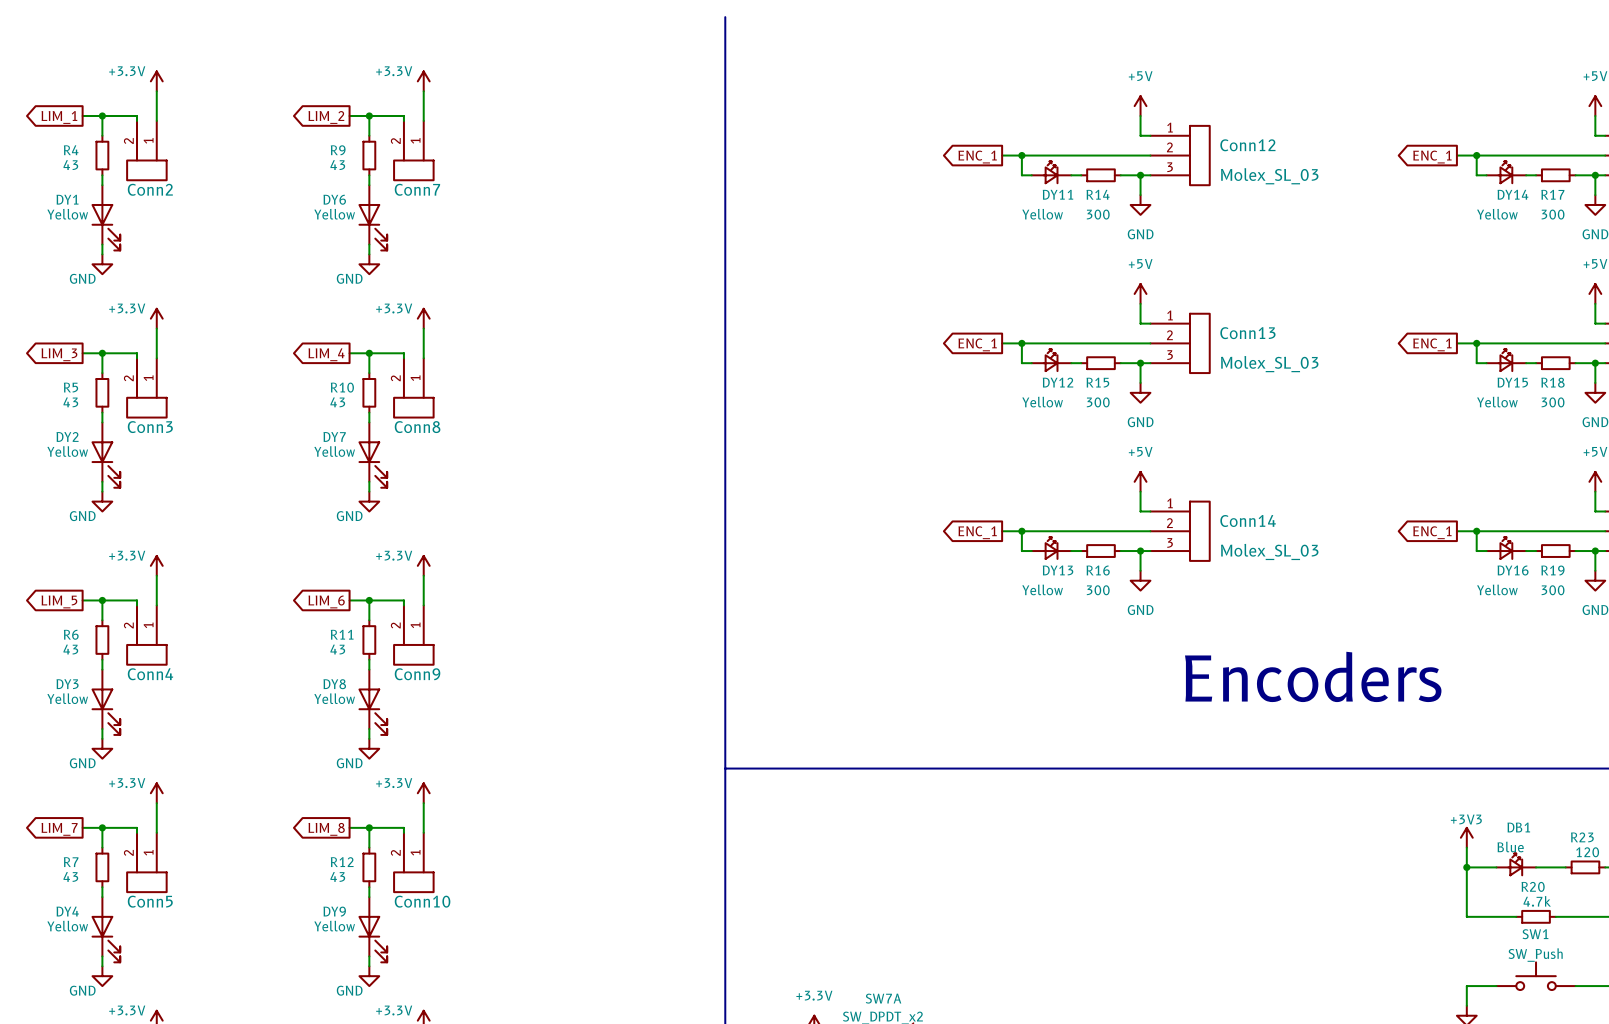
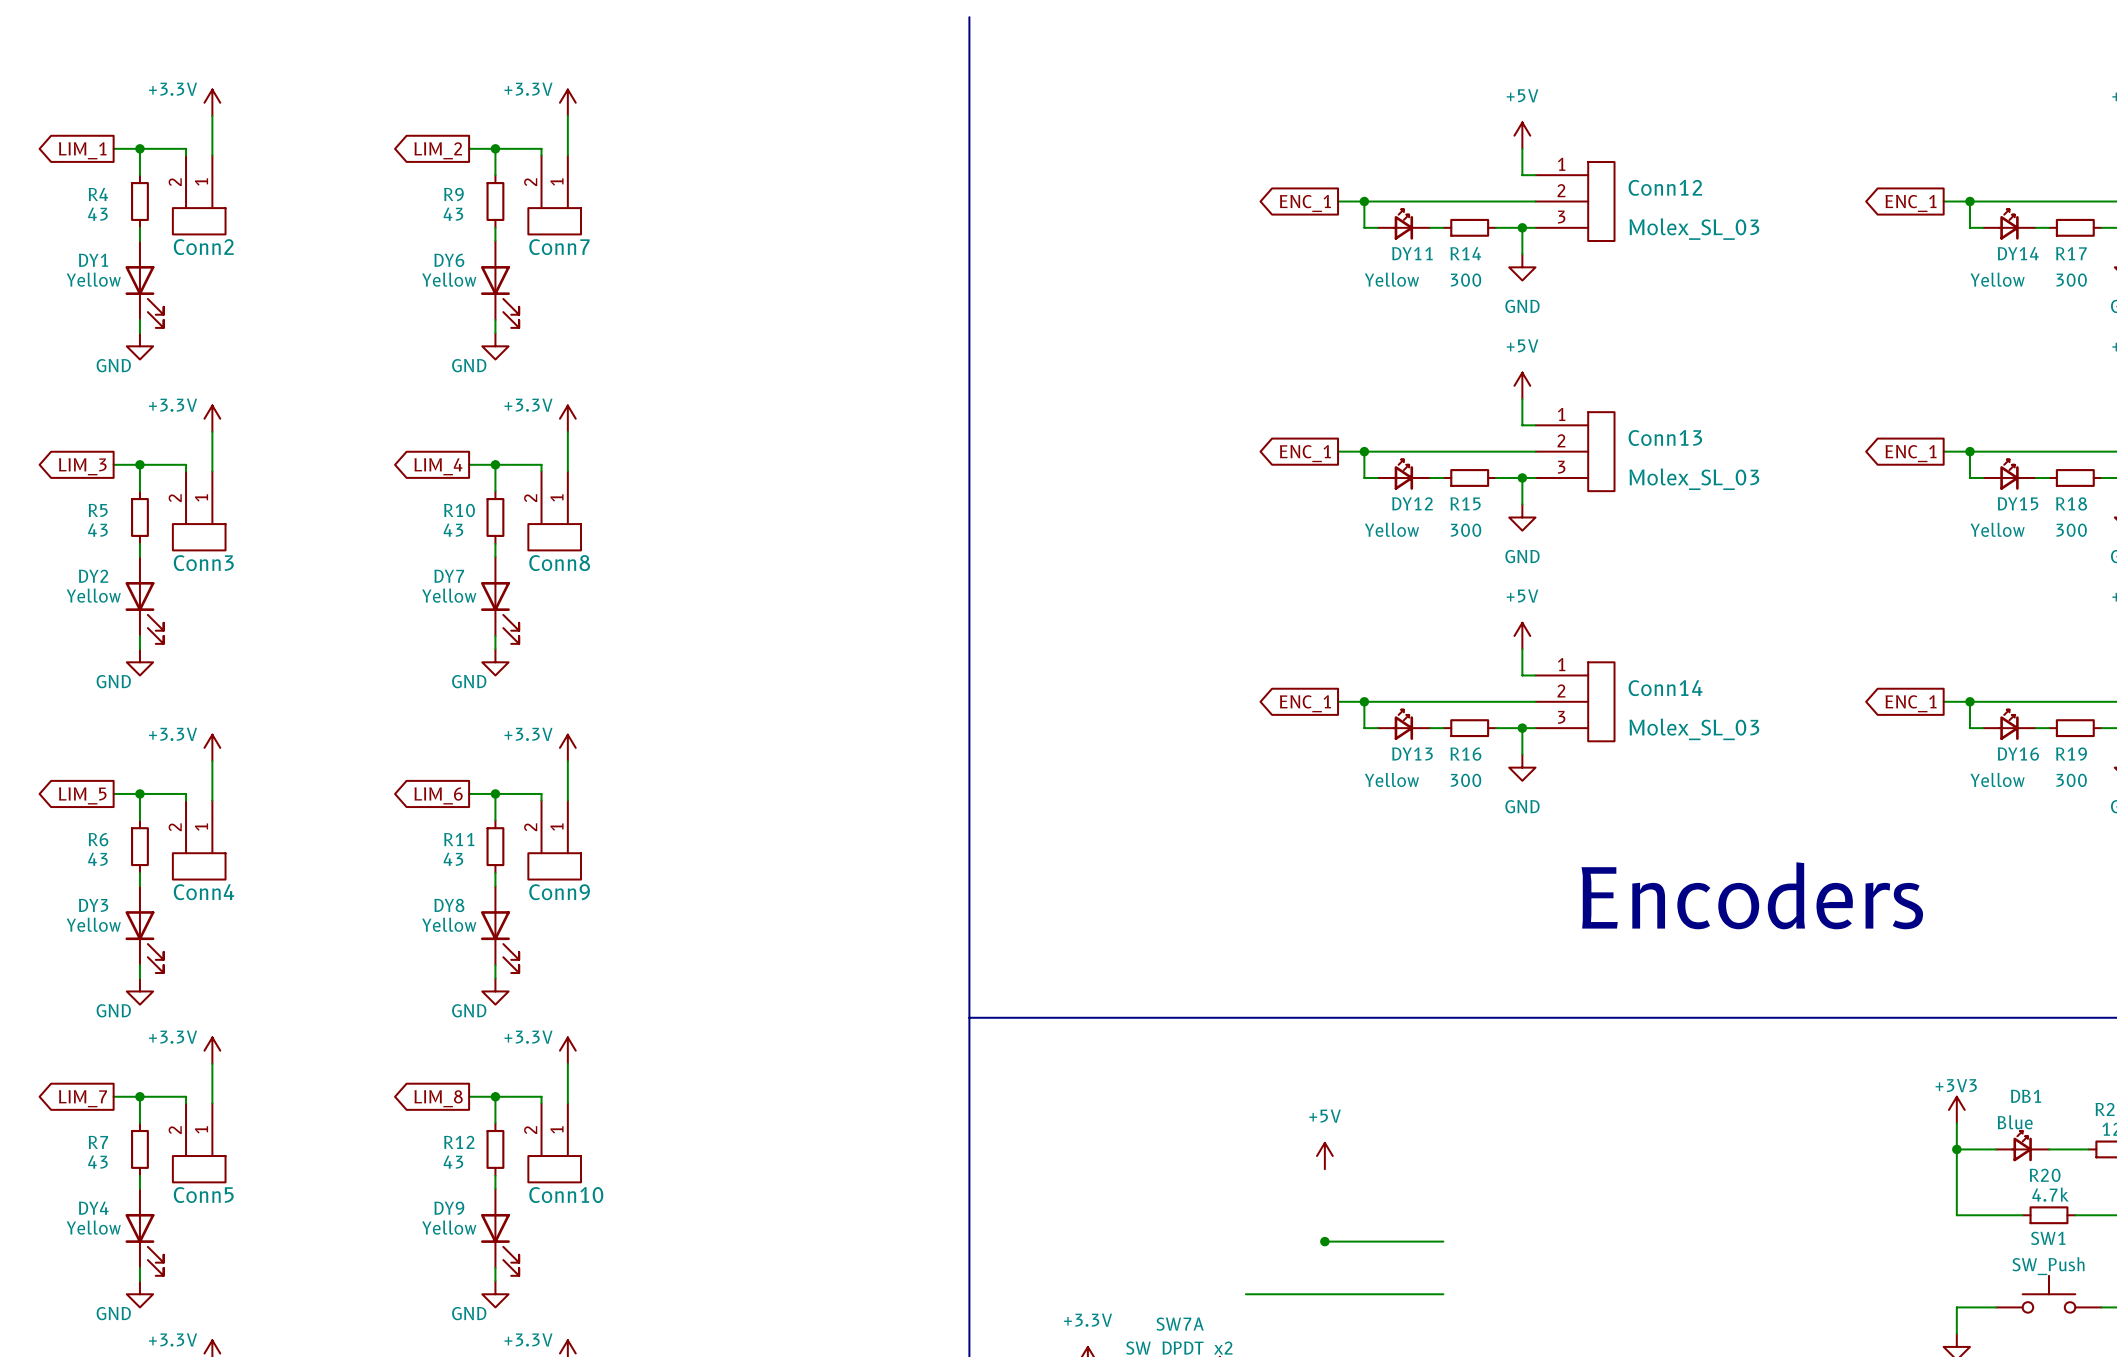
power symbol: none -> +5V (1324, 1156)
wire: none -> (1324, 1241) (1443, 1241)
junction: none -> (1324, 1241)
wire: none -> (1245, 1294) (1443, 1294)

